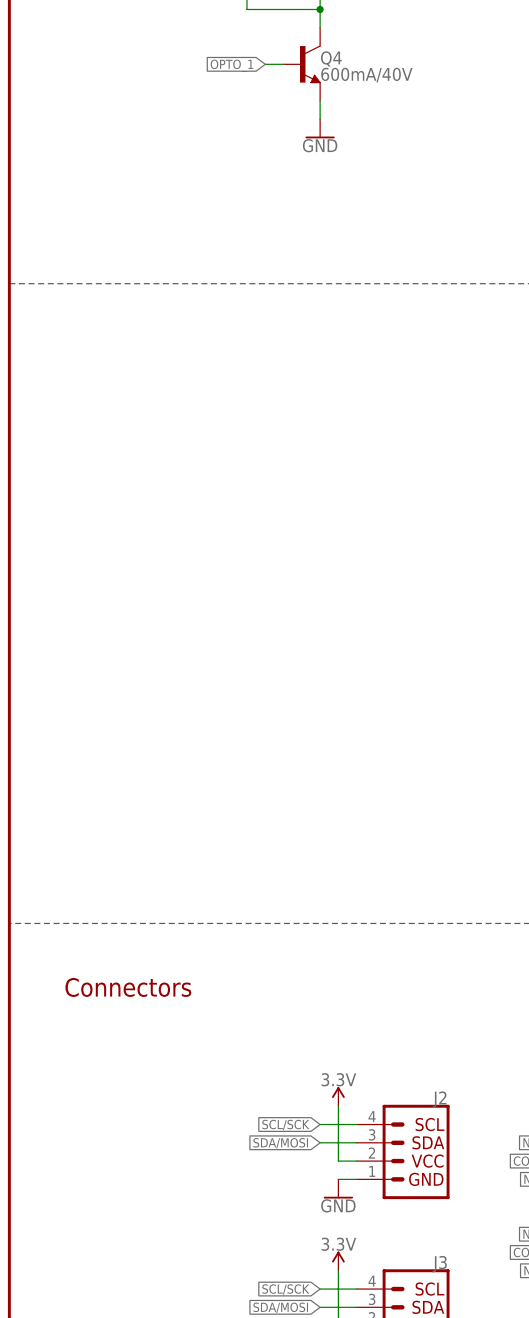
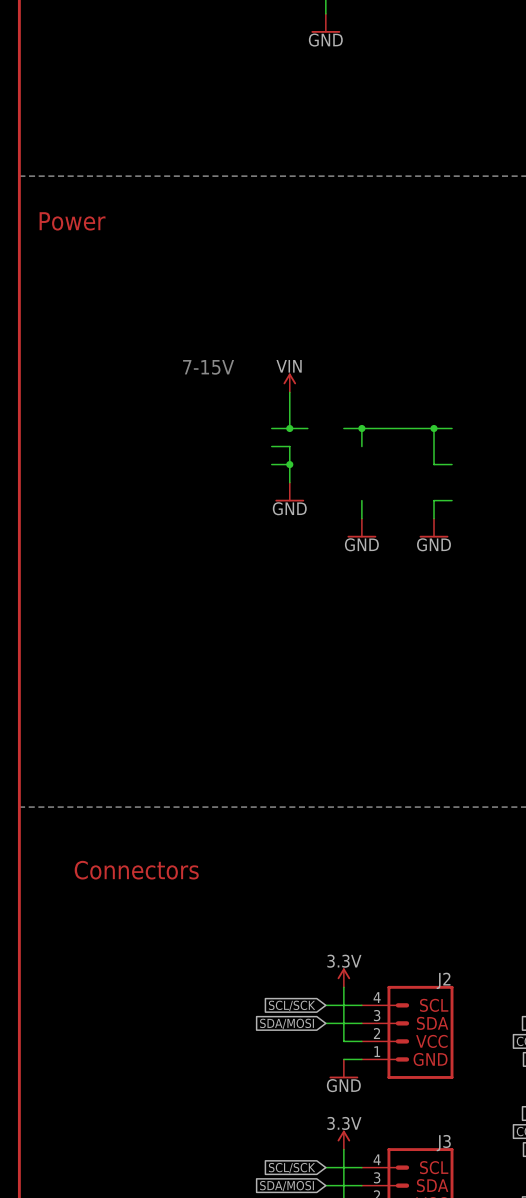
text: none -> Power (72, 221)
text: none -> 7-15V (208, 367)
power symbol: none -> VIN (289, 382)
wire: none -> (289, 392) (289, 428)
wire: none -> (271, 428) (307, 428)
junction: none -> (289, 428)
wire: none -> (343, 428) (452, 428)
wire: none -> (361, 428) (361, 446)
junction: none -> (361, 428)
wire: none -> (434, 428) (434, 464) (452, 464)
junction: none -> (434, 428)
wire: none -> (271, 446) (289, 446) (289, 482)
wire: none -> (271, 464) (289, 464)
junction: none -> (289, 464)
power symbol: none -> GND (289, 492)
wire: none -> (361, 500) (361, 518)
wire: none -> (452, 500) (434, 500) (434, 518)
power symbol: none -> GND (361, 528)
power symbol: none -> GND (434, 528)

